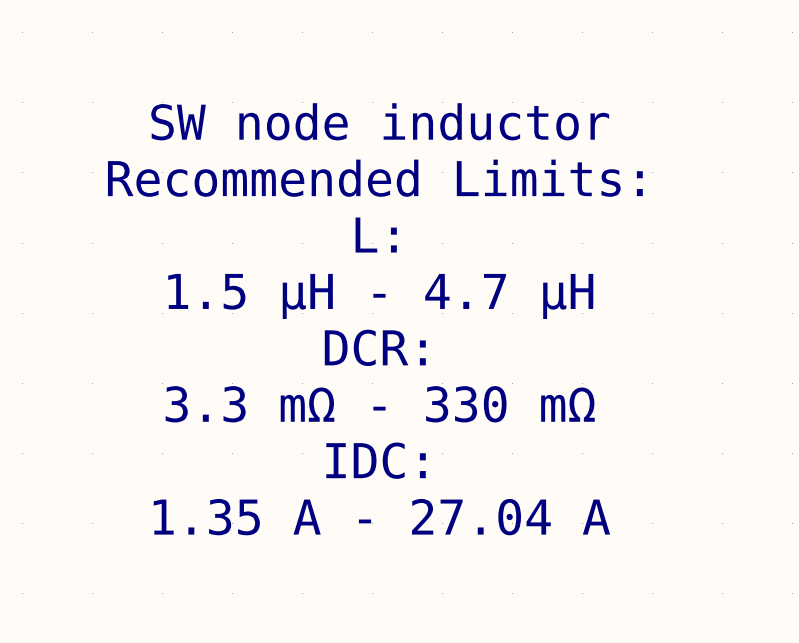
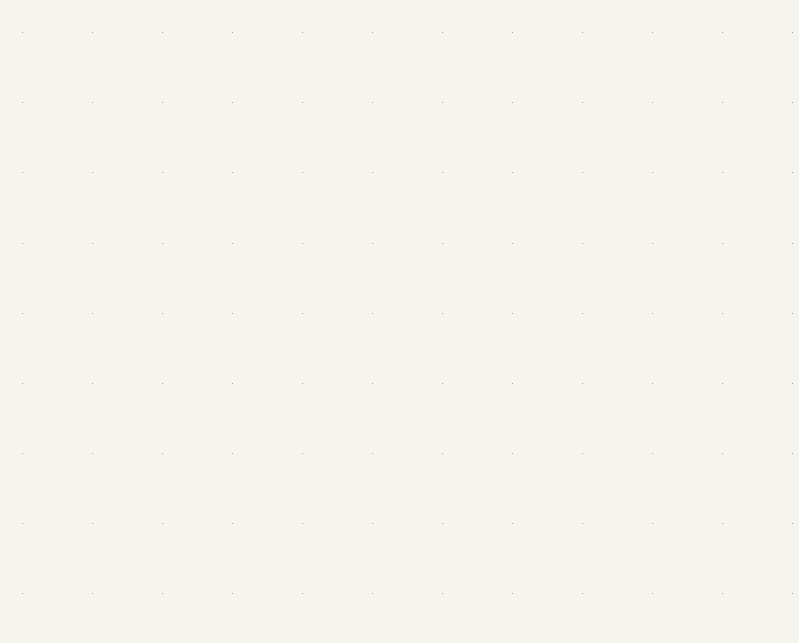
text: SW node inductor (380, 121) -> none
text: Recommended Limits: (375, 178) -> none
text: L: (376, 235) -> none
text: 1.5 μH - 4.7 μH (380, 296) -> none
text: DCR: (375, 347) -> none
text: 3.3 mΩ - 330 mΩ (380, 404) -> none
text: IDC: (376, 460) -> none
text: 1.35 A - 27.04 A (381, 517) -> none

